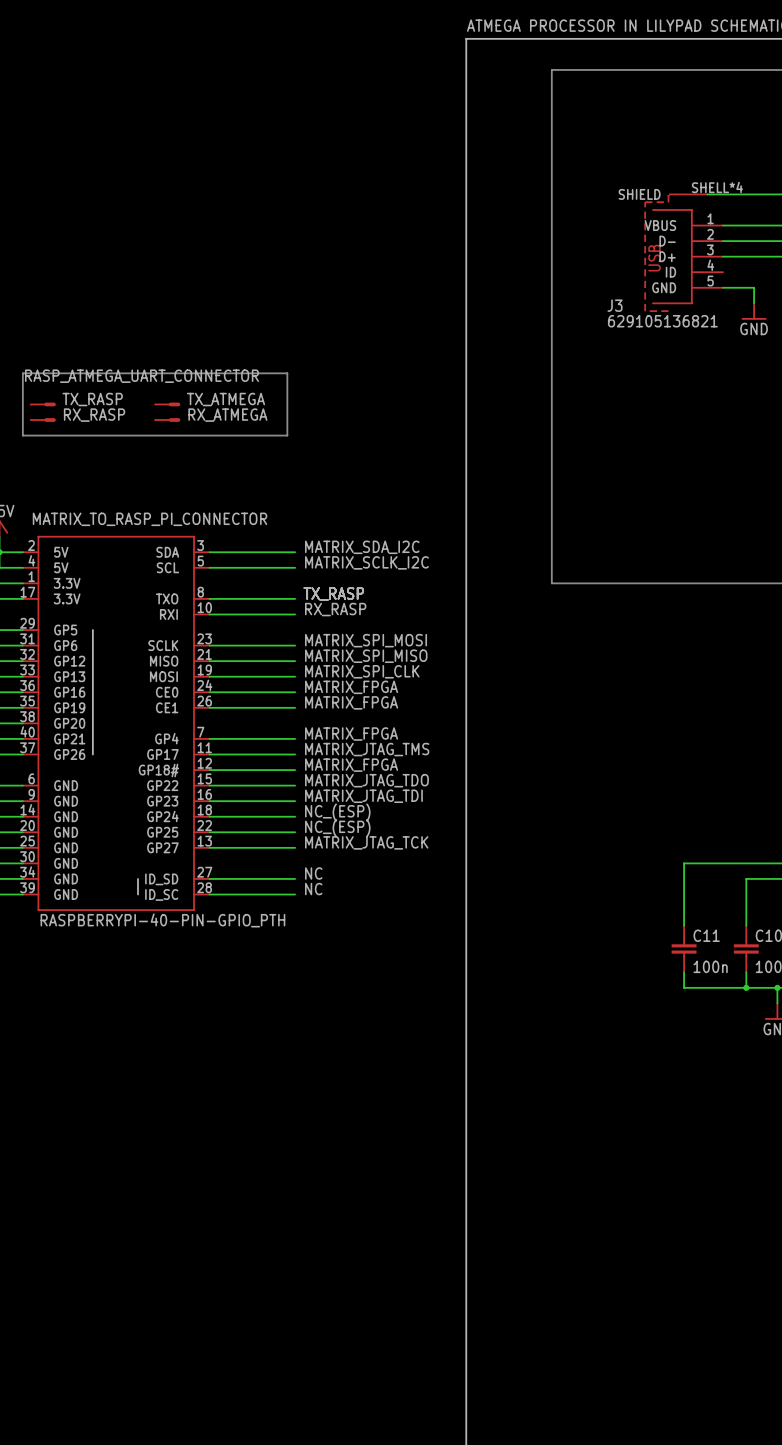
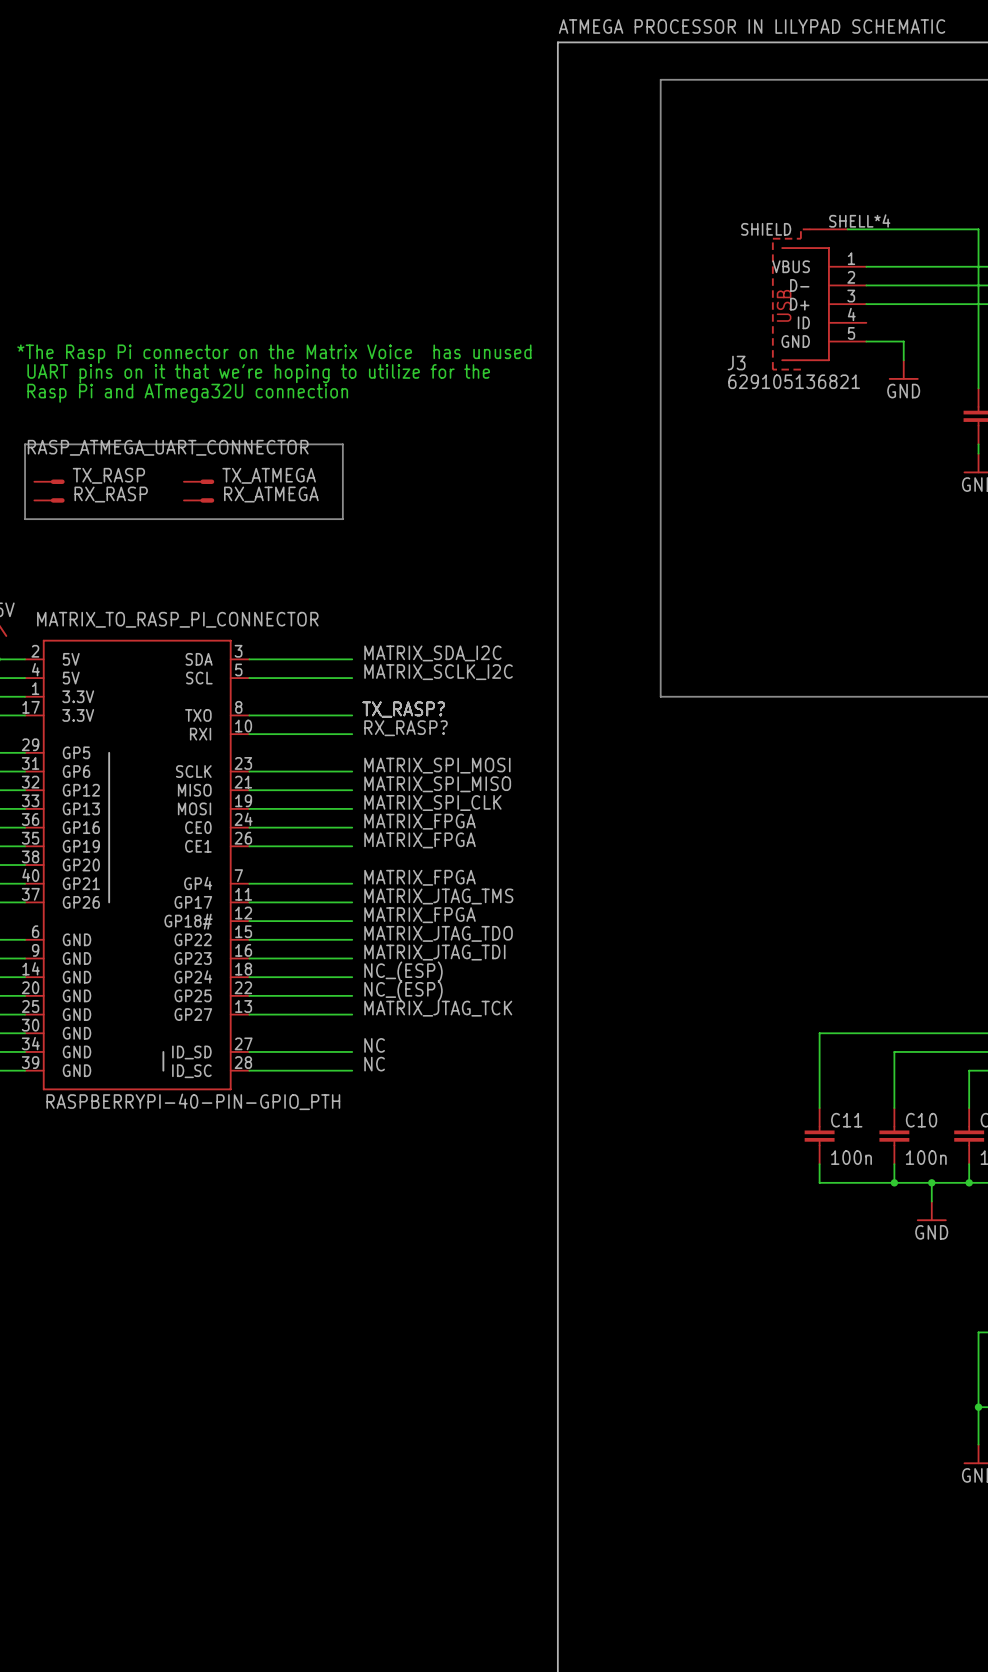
text: none -> *The Rasp Pi connector on the Matrix Voice has unused (274, 353)
text: none -> UART pins on it that we're hoping to utilize for the (258, 373)
text: none -> Rasp Pi and ATmega32U connection (187, 393)
label: TX_RASP (333, 593) -> TX_RASP? (403, 709)
label: RX_RASP (335, 609) -> RX_RASP? (405, 728)

